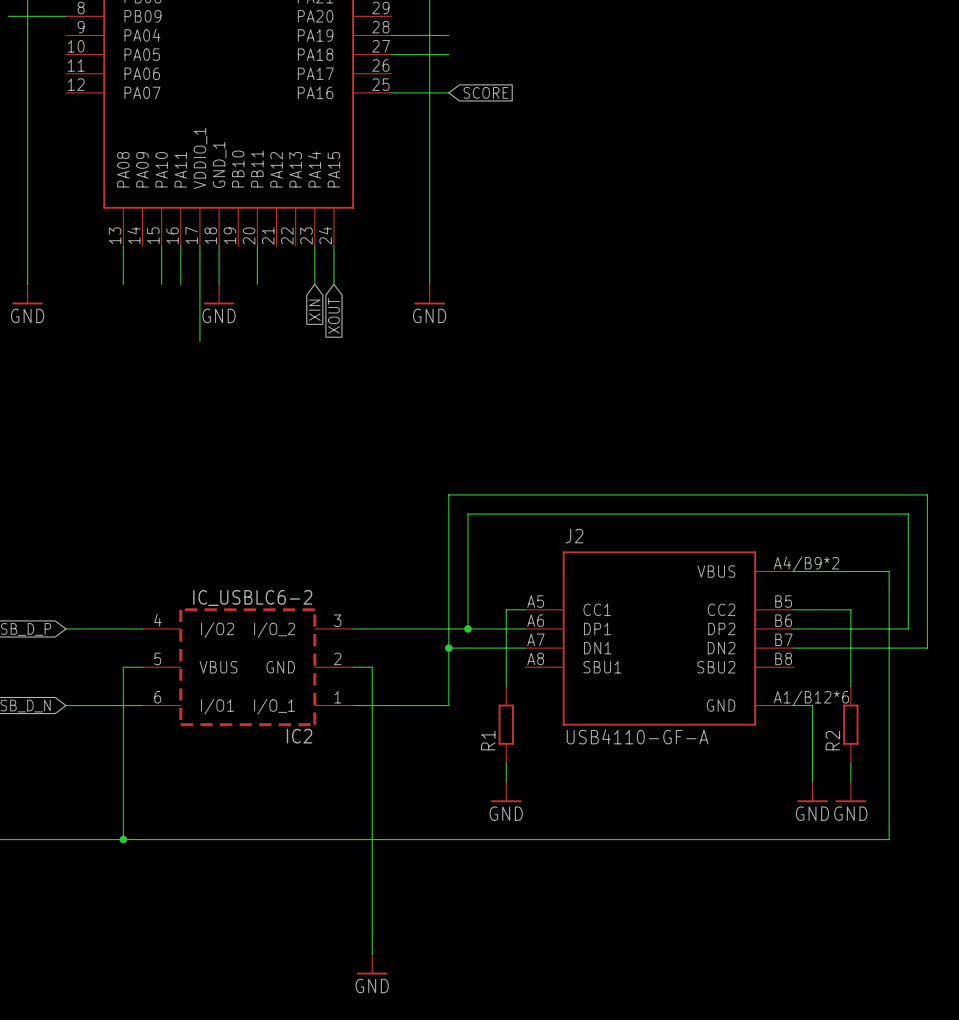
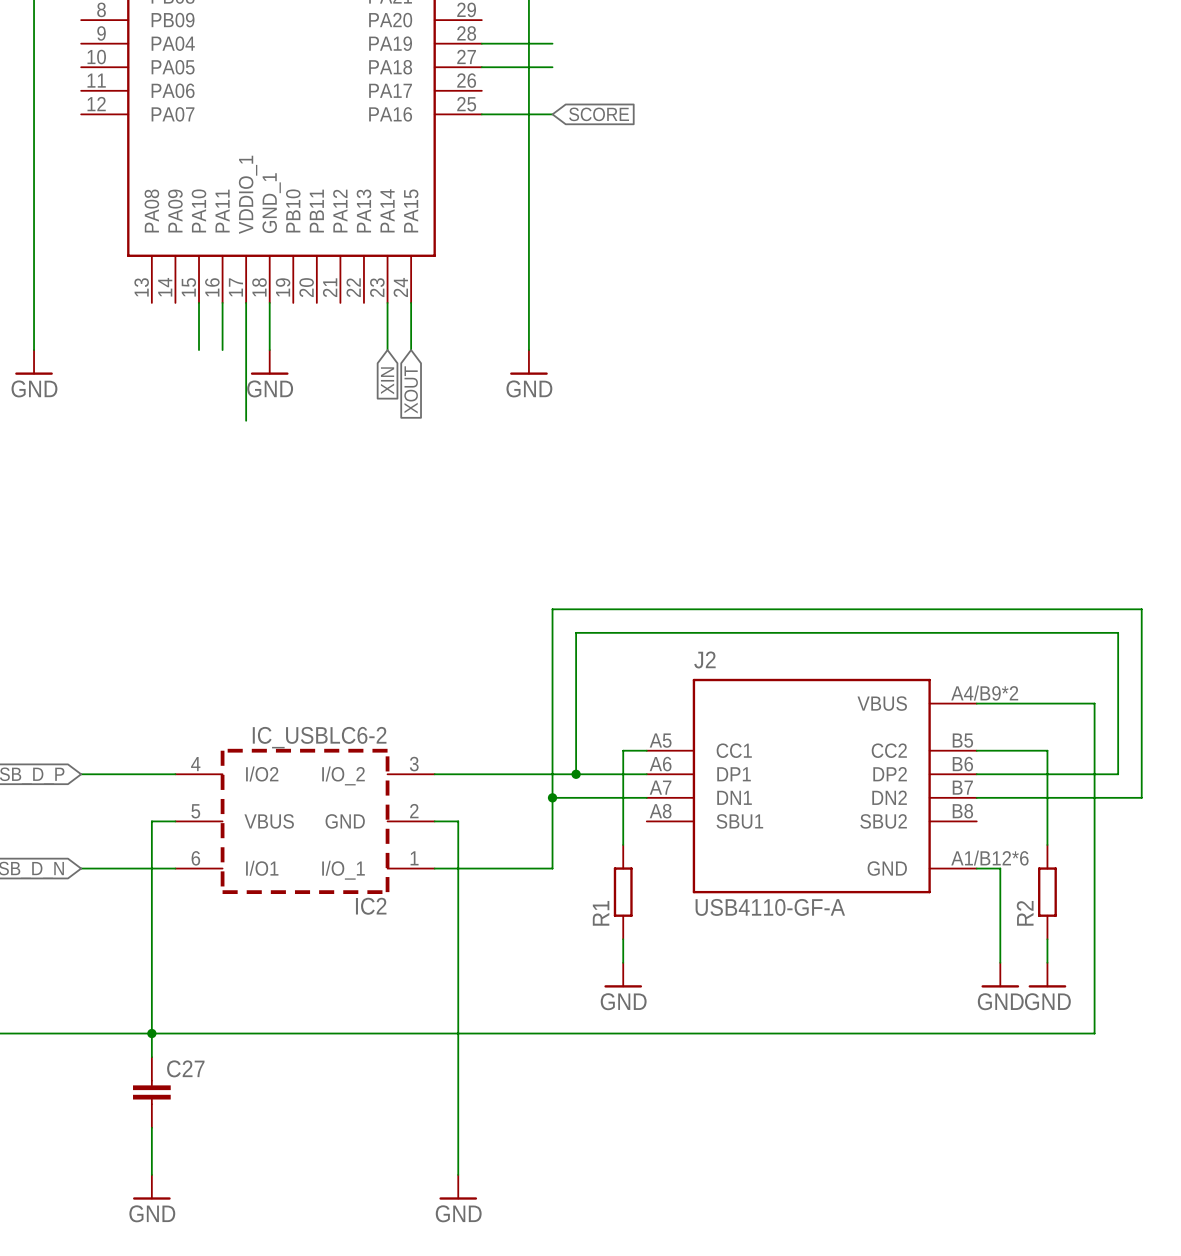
wire: (8, 16) (65, 16) -> none
wire: (123, 246) (123, 284) -> none
wire: (257, 246) (257, 284) -> none
wire: none -> (151, 1033) (151, 1057)
C27: none -> (151, 1092)
wire: none -> (151, 1127) (151, 1174)
power symbol: none -> GND (151, 1187)

